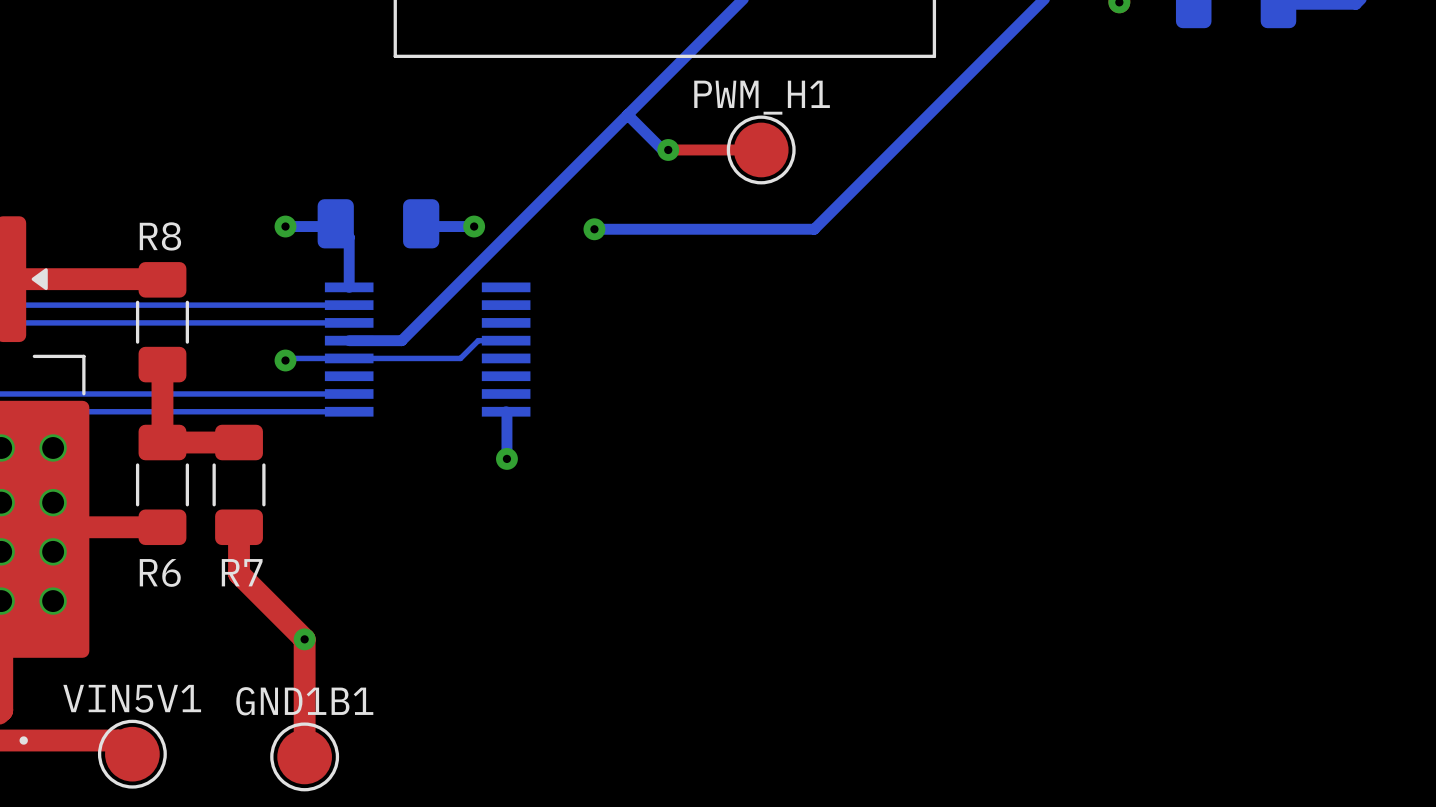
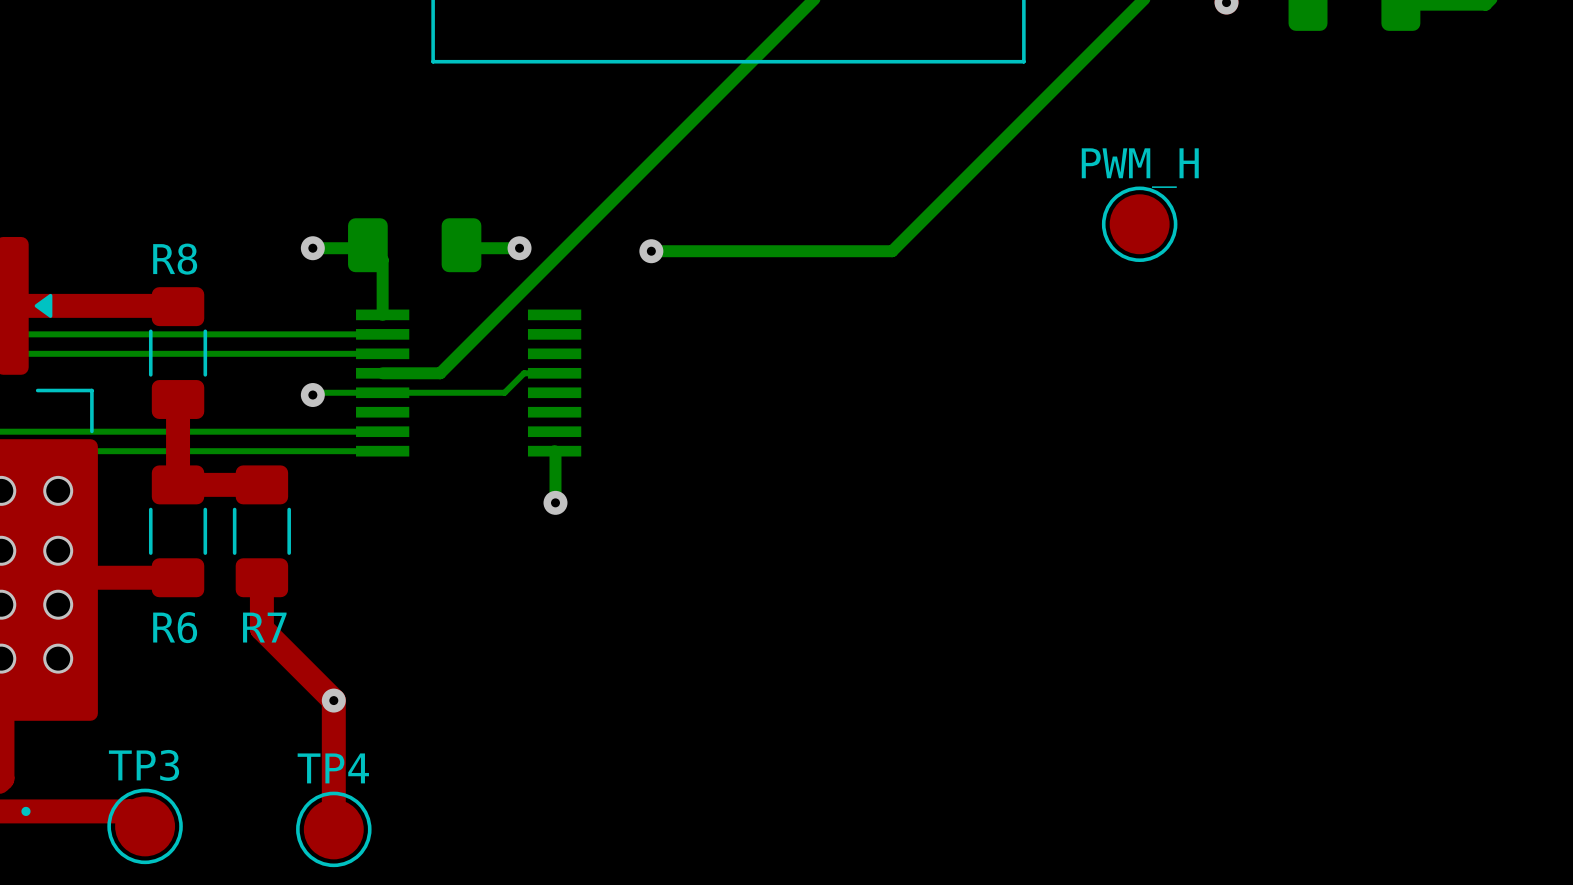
bottom track: (627, 114) (662, 149) (668, 149) -> none
top track: (668, 149) (761, 149) -> none
via: (668, 149) -> none
PWM_H1: (761, 149) -> none
PWM_H: none -> (1139, 224)
VIN5V1 name: VIN5V1 (132, 698) -> TP3 (144, 765)
GND1B1 name: GND1B1 (304, 701) -> TP4 (333, 768)

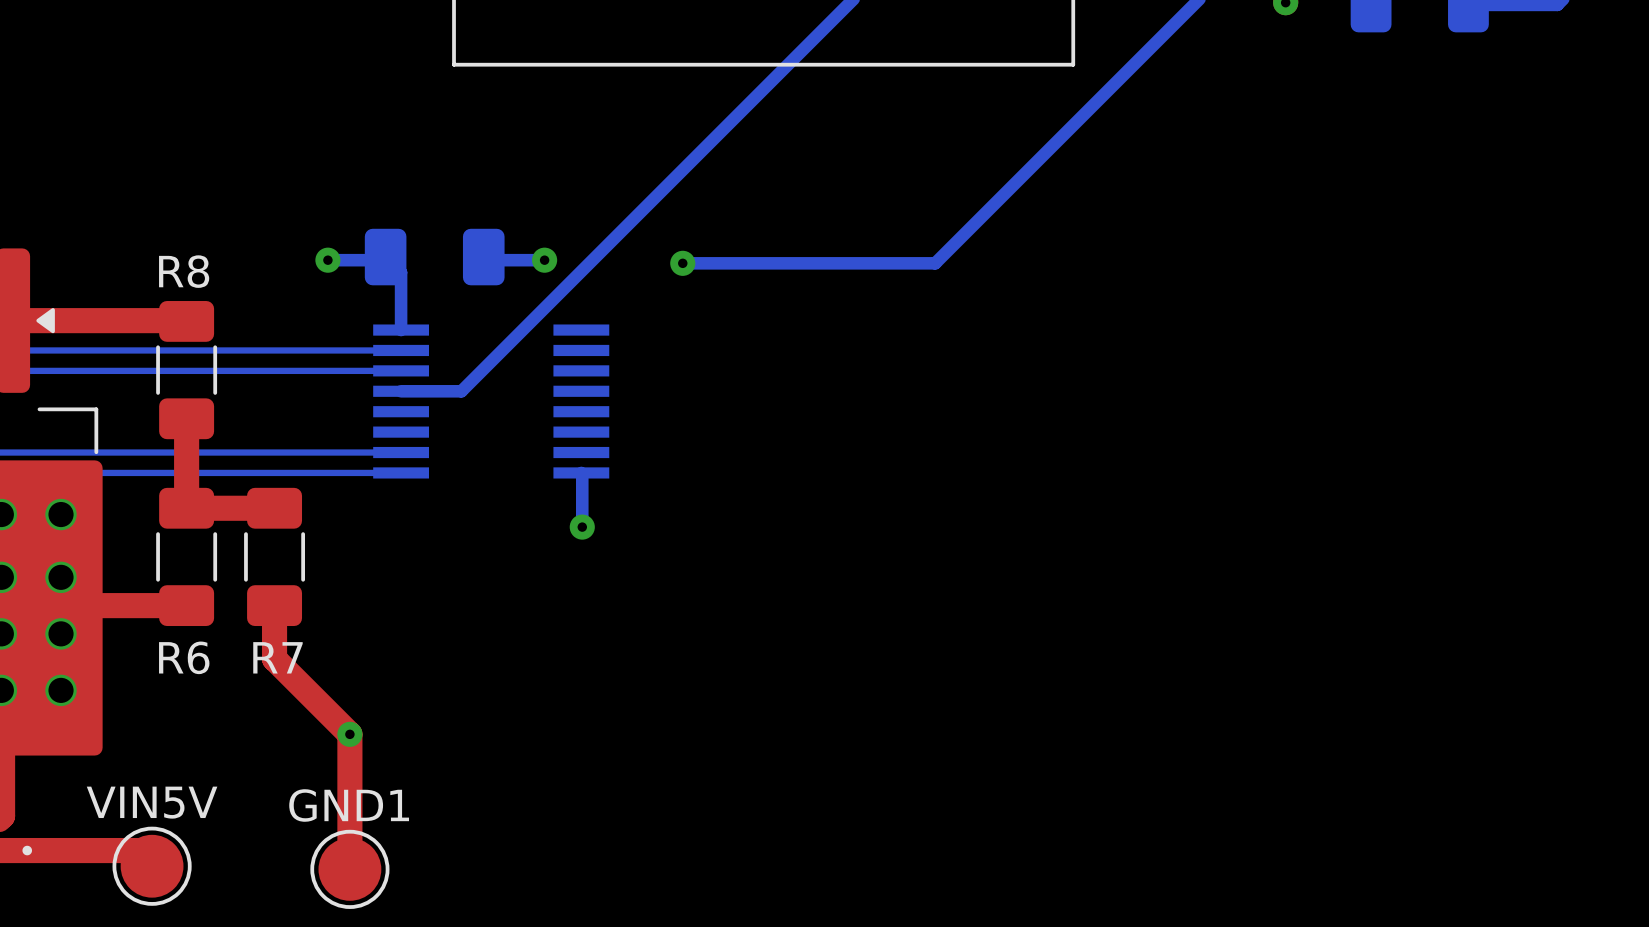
PWM_H: (1139, 224) -> none
bottom track: (554, 373) (524, 373) (504, 392) (315, 392) (312, 395) -> none
via: (312, 395) -> none
TP3 name: TP3 (144, 765) -> VIN5V (152, 802)
TP4 name: TP4 (333, 768) -> GND1 (349, 805)

